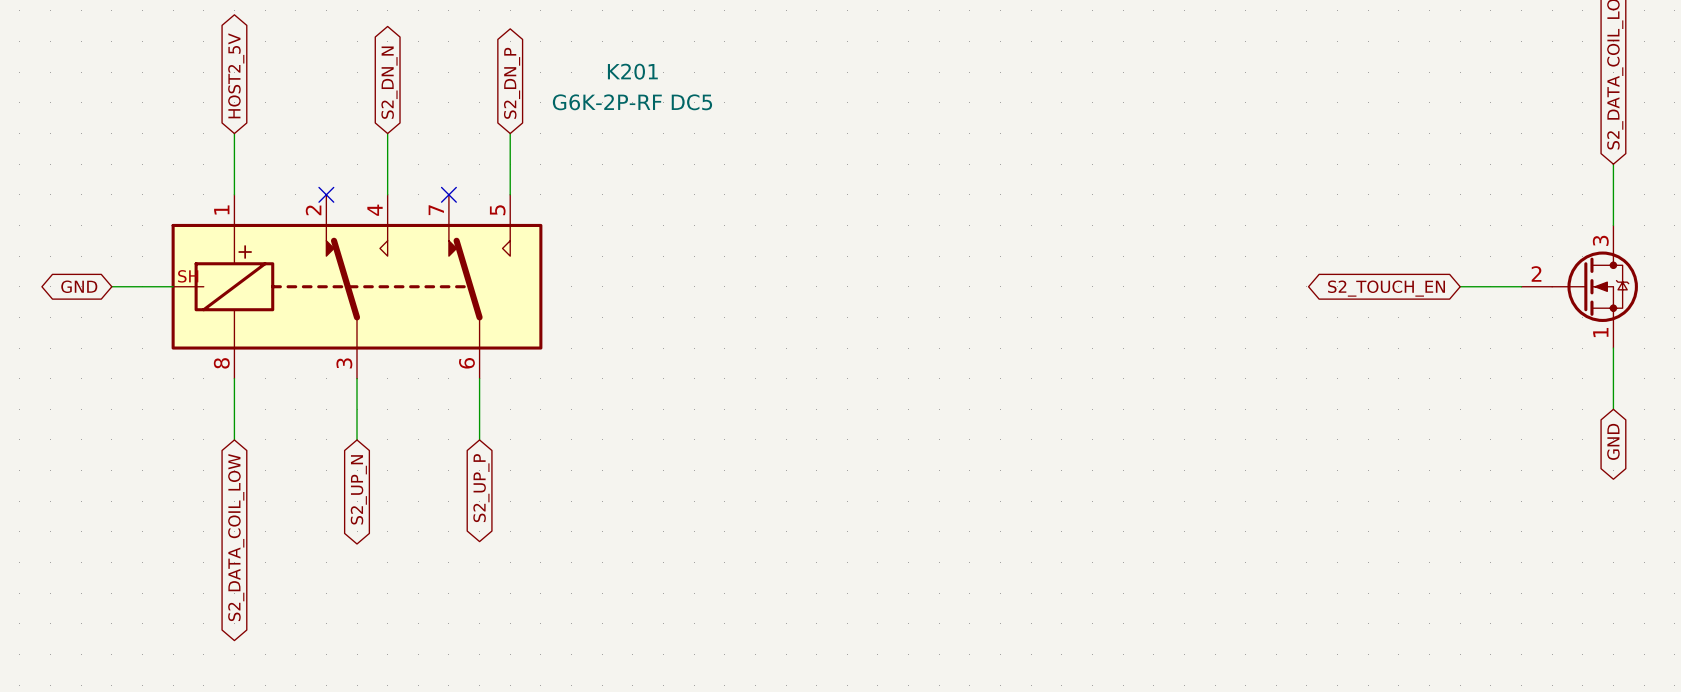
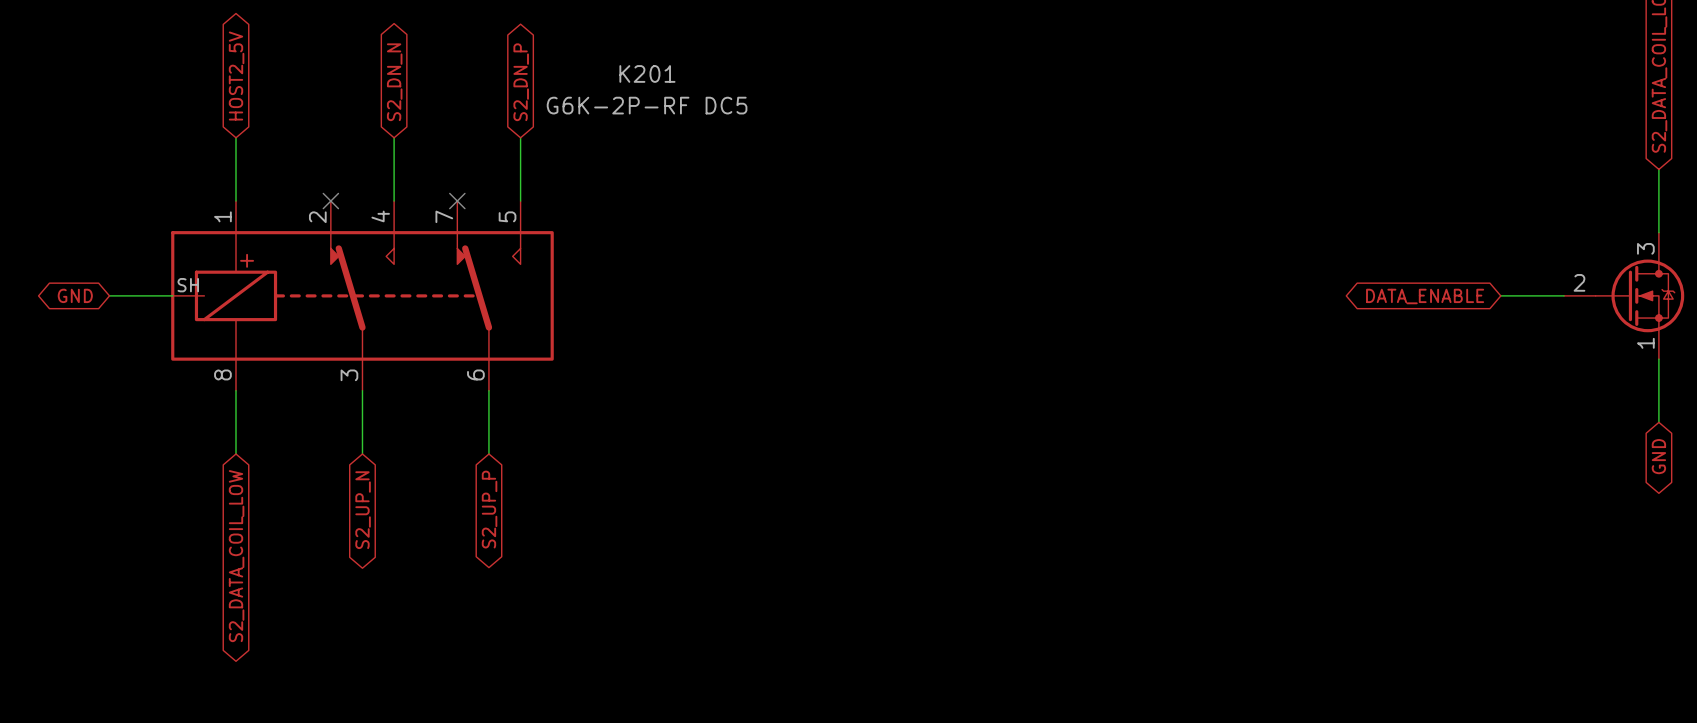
global label: S2_TOUCH_EN (1386, 288) -> DATA_ENABLE (1425, 296)

